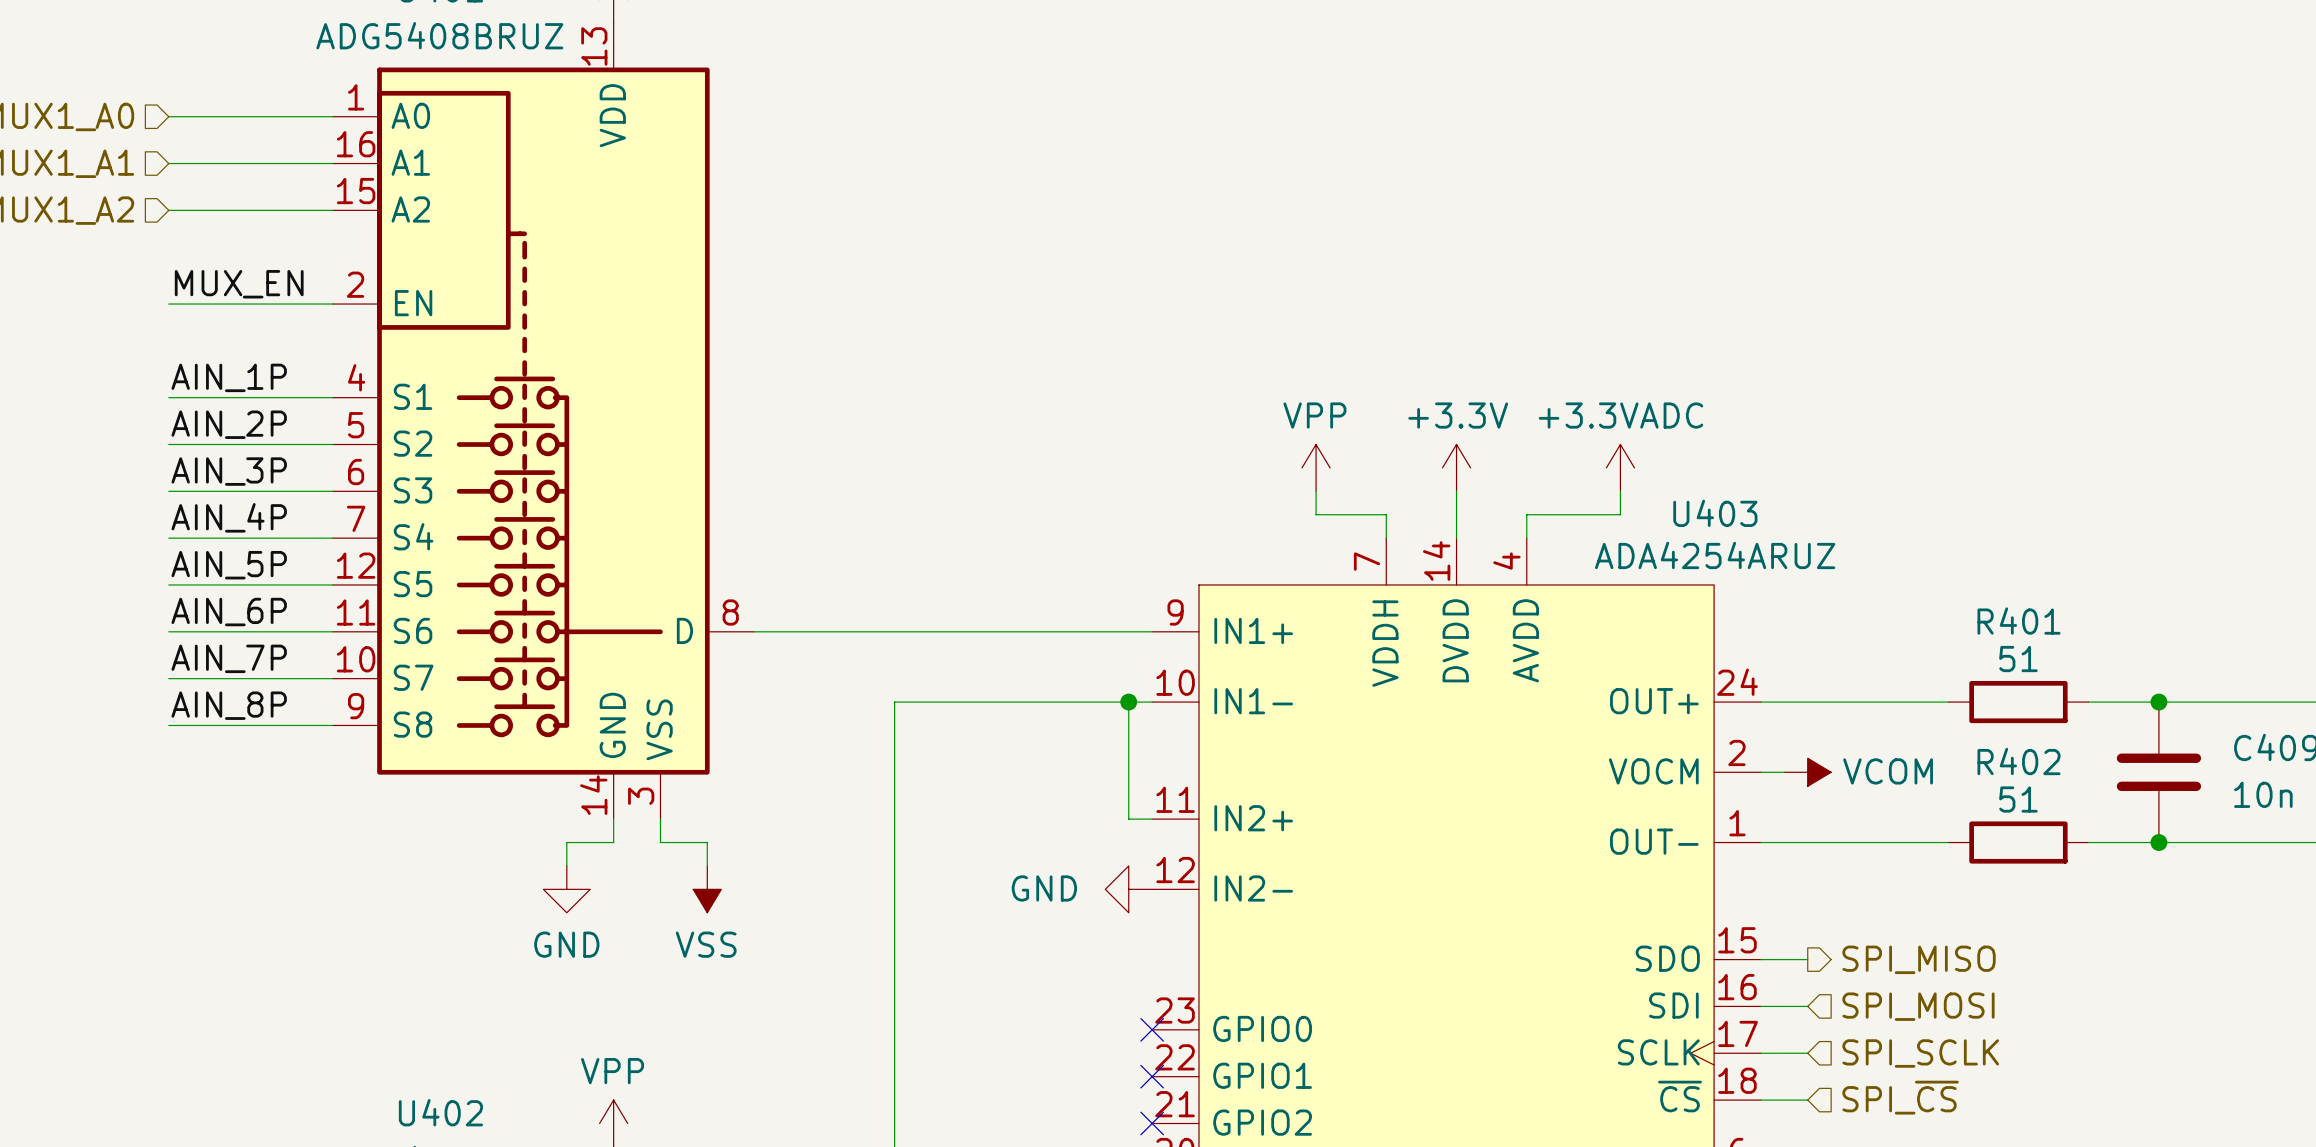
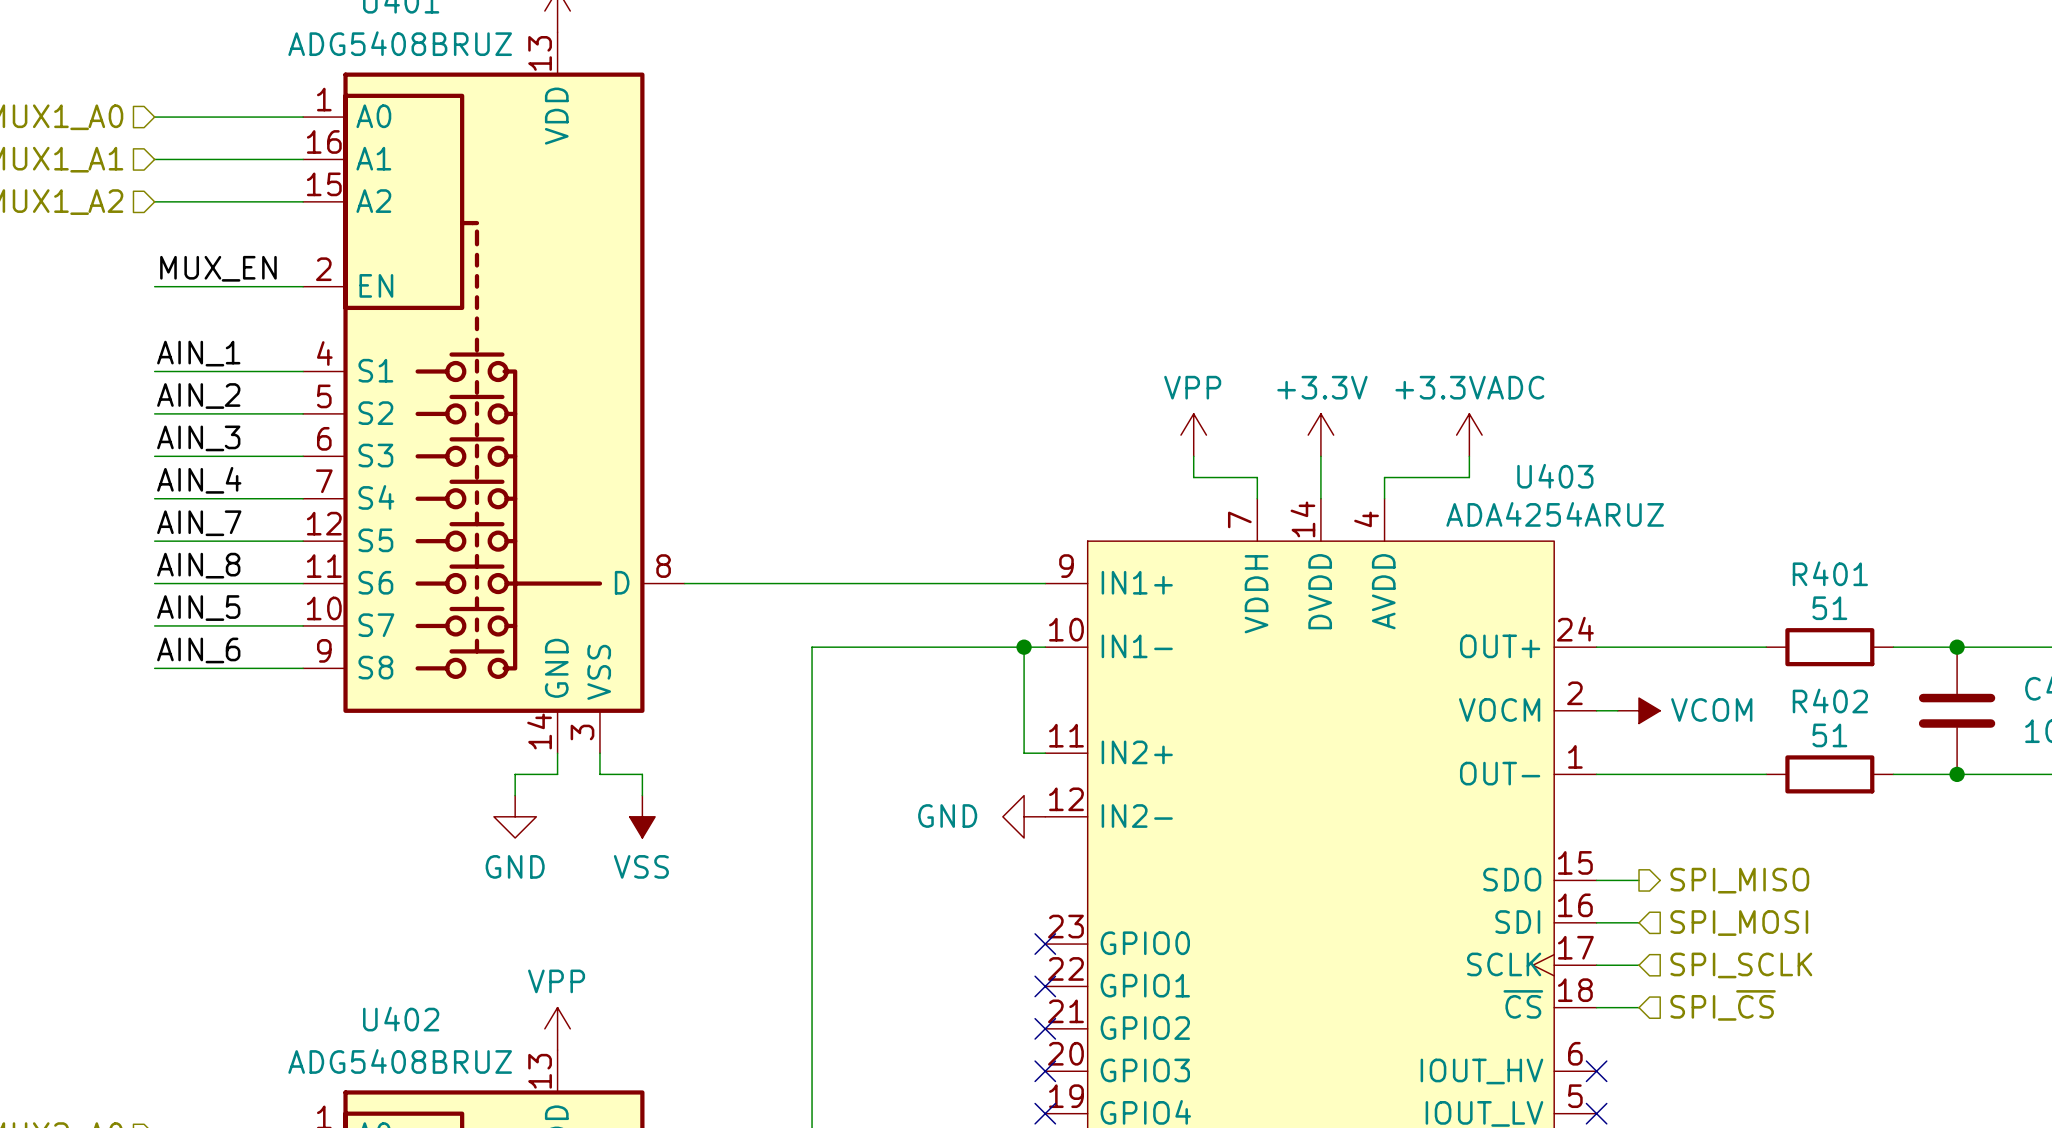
label: AIN_1P (229, 377) -> AIN_1 (198, 353)
label: AIN_2P (229, 424) -> AIN_2 (198, 396)
label: AIN_3P (229, 471) -> AIN_3 (198, 438)
label: AIN_4P (229, 517) -> AIN_4 (199, 480)
label: AIN_5P (229, 565) -> AIN_7 (199, 523)
label: AIN_6P (229, 612) -> AIN_8 (198, 565)
label: AIN_7P (229, 658) -> AIN_5 (198, 608)
label: AIN_8P (229, 705) -> AIN_6 (198, 650)

